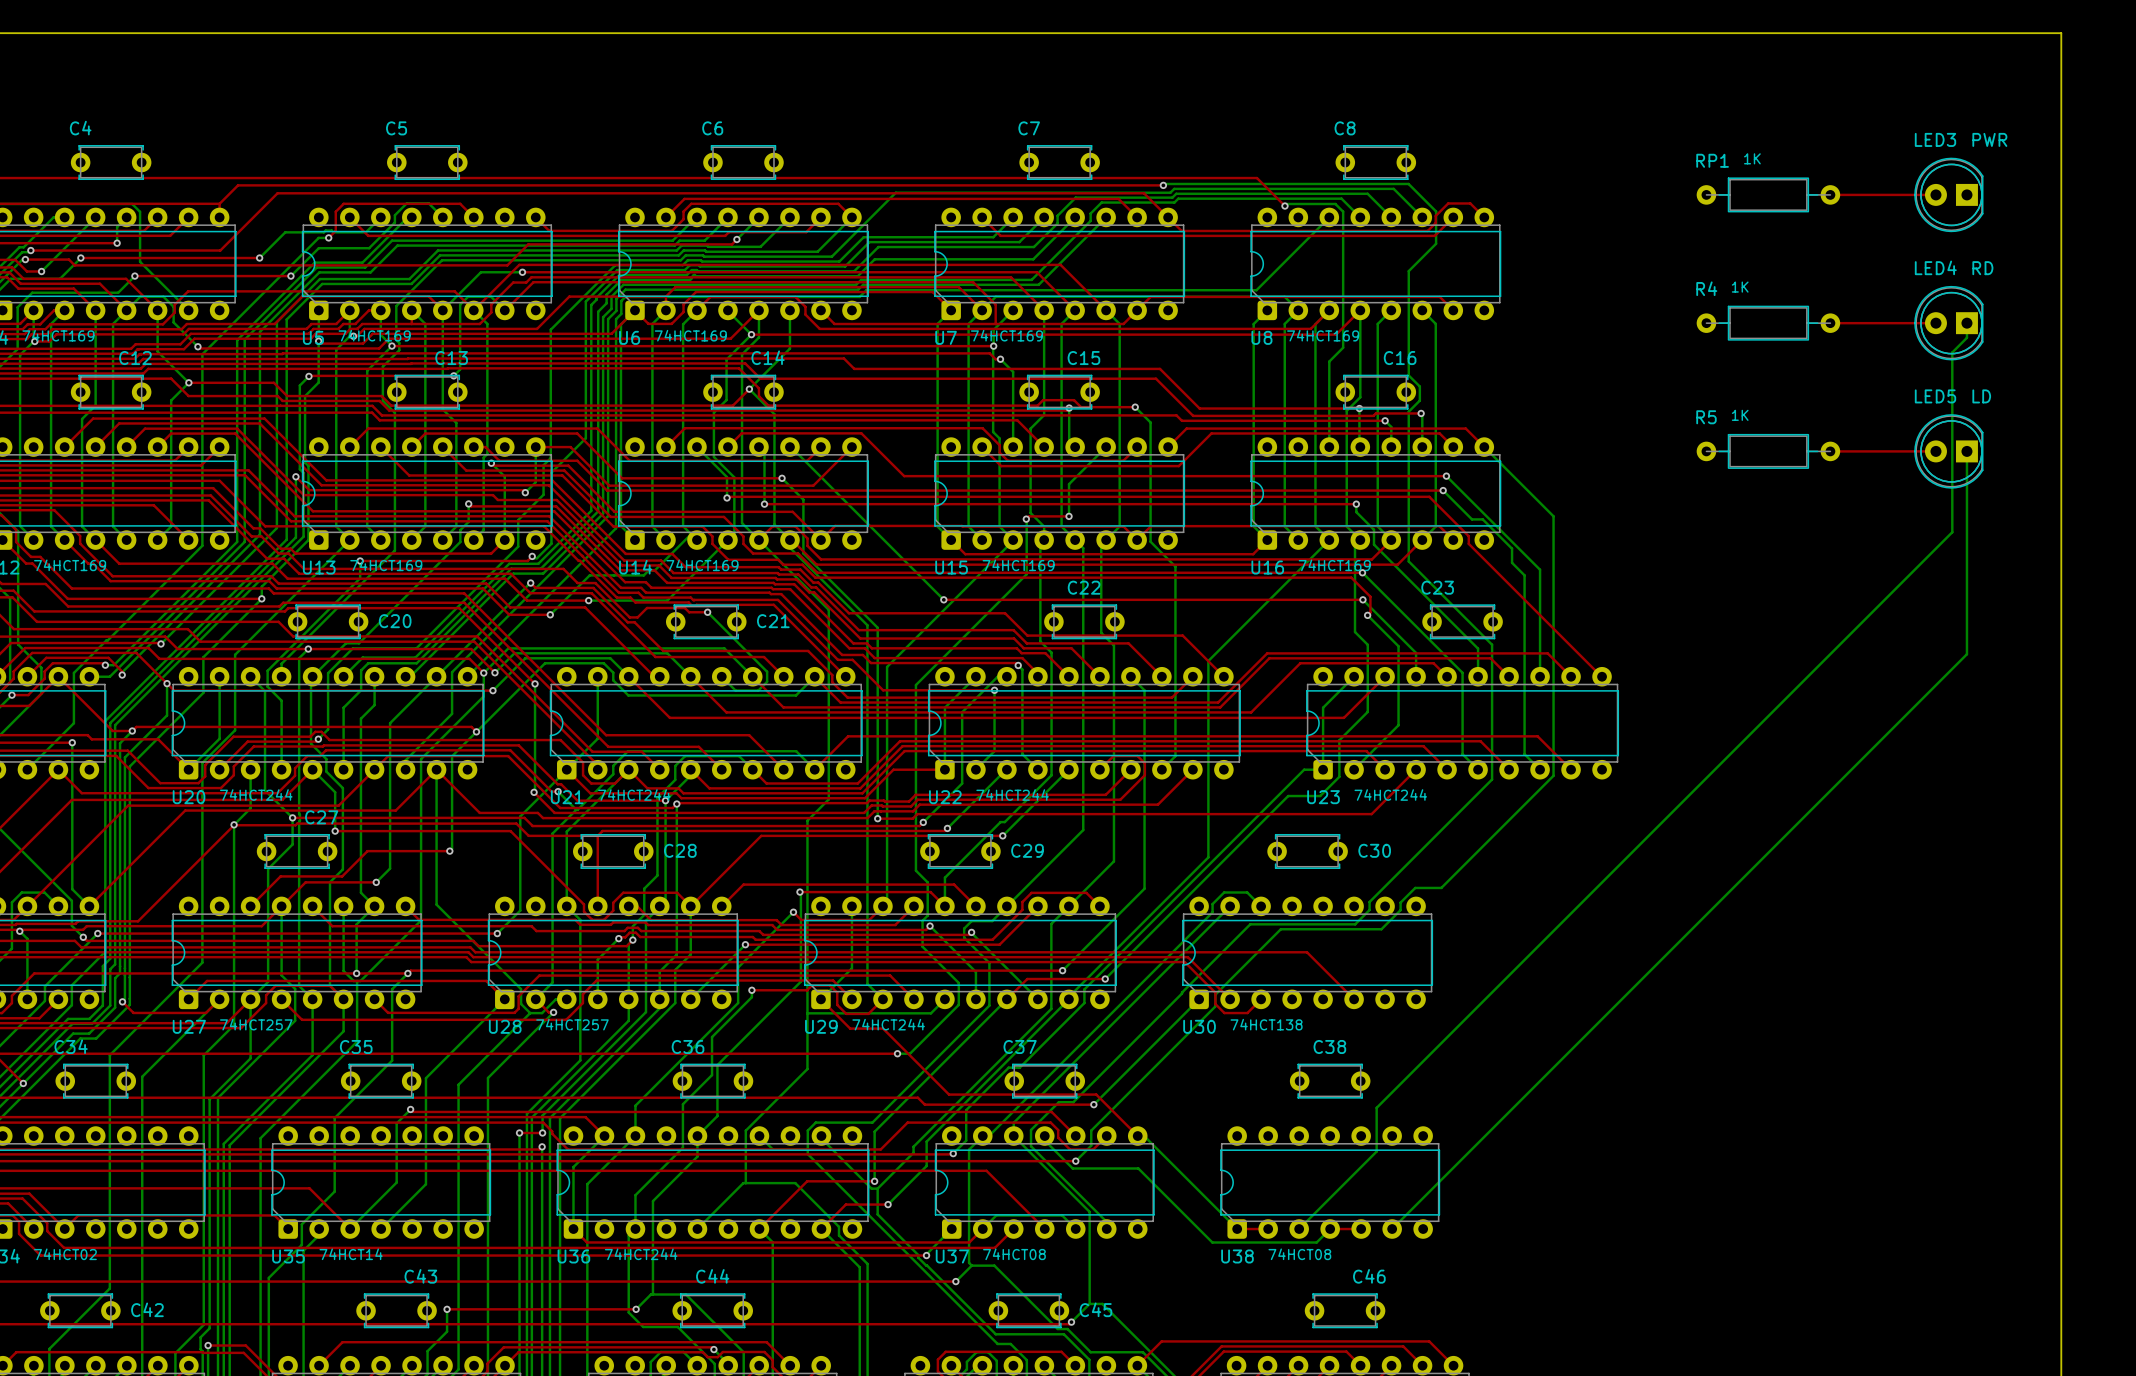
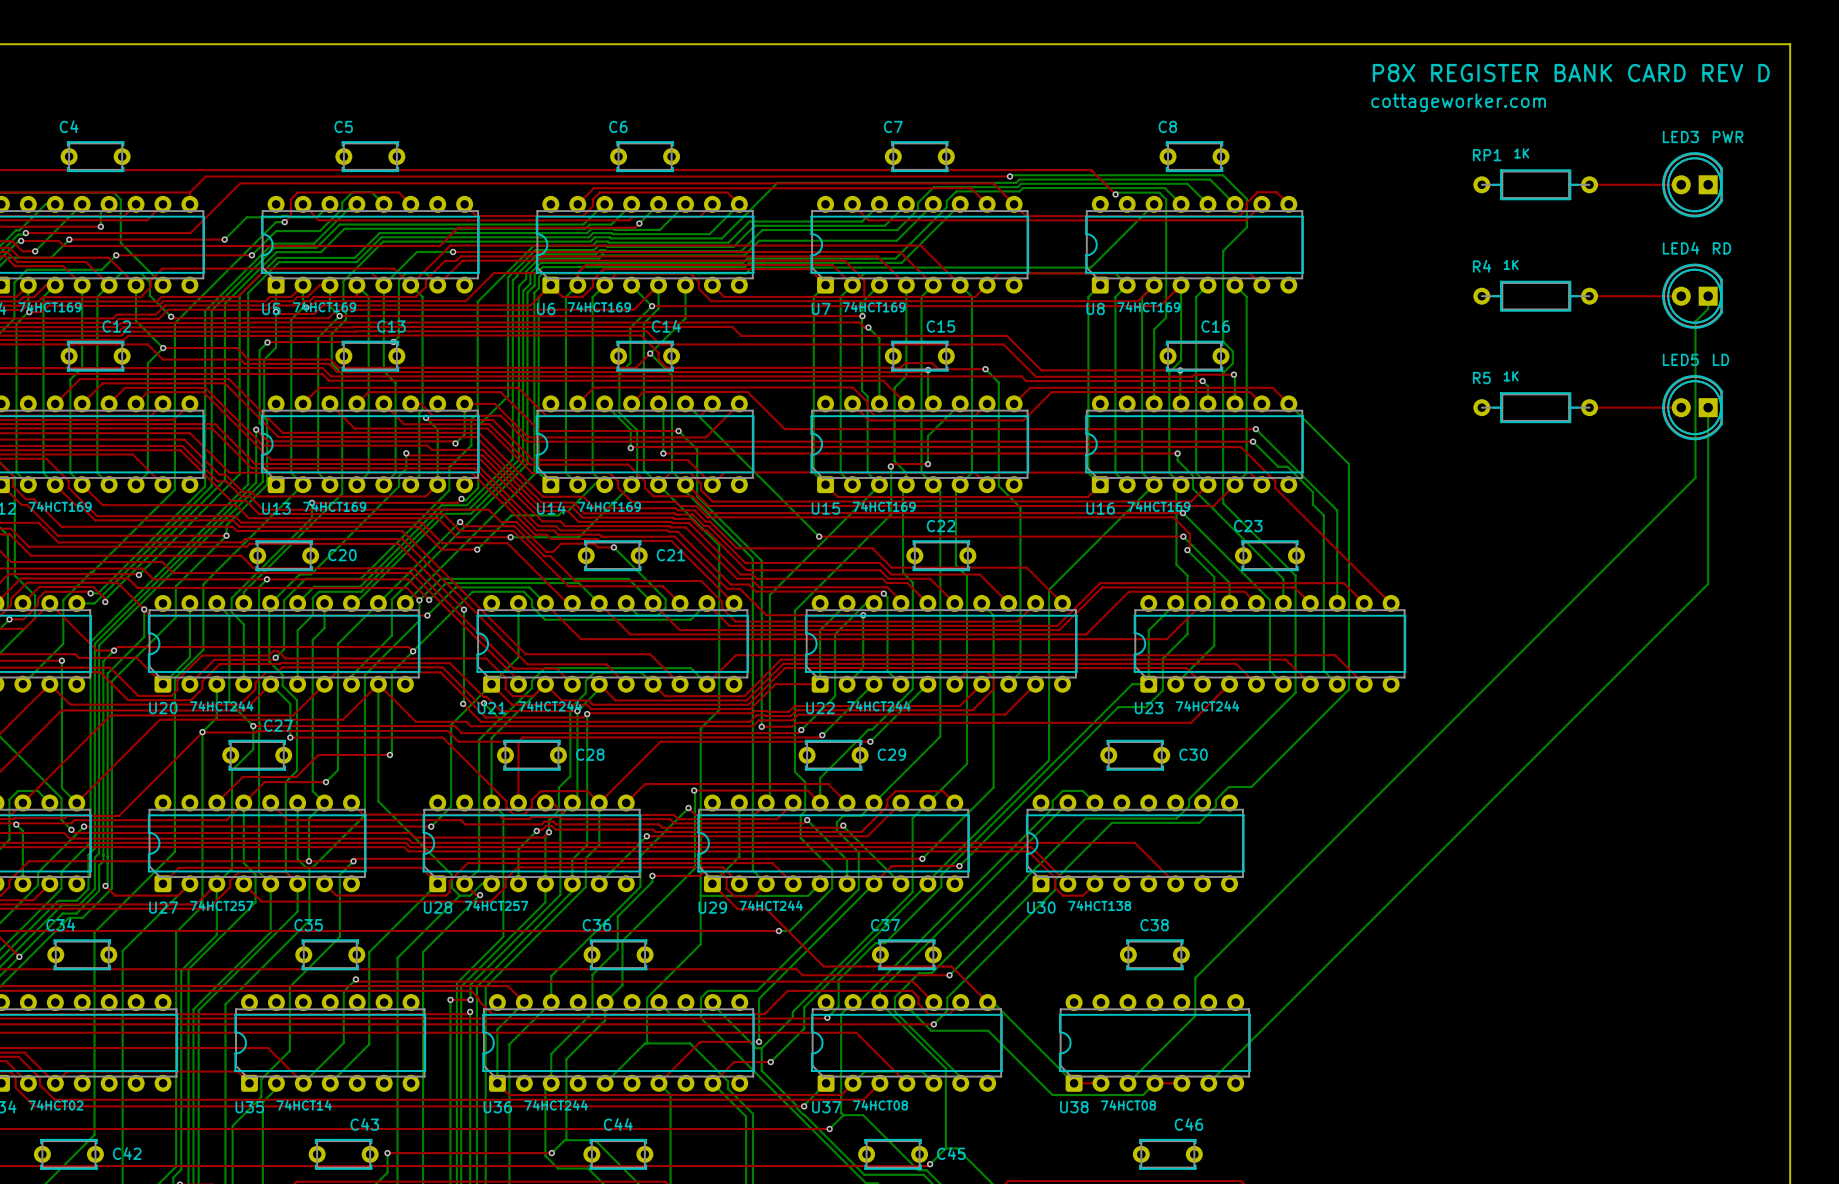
text: none -> P8X REGISTER BANK CARD REV D (1571, 73)
text: none -> cottageworker.com (1458, 102)

